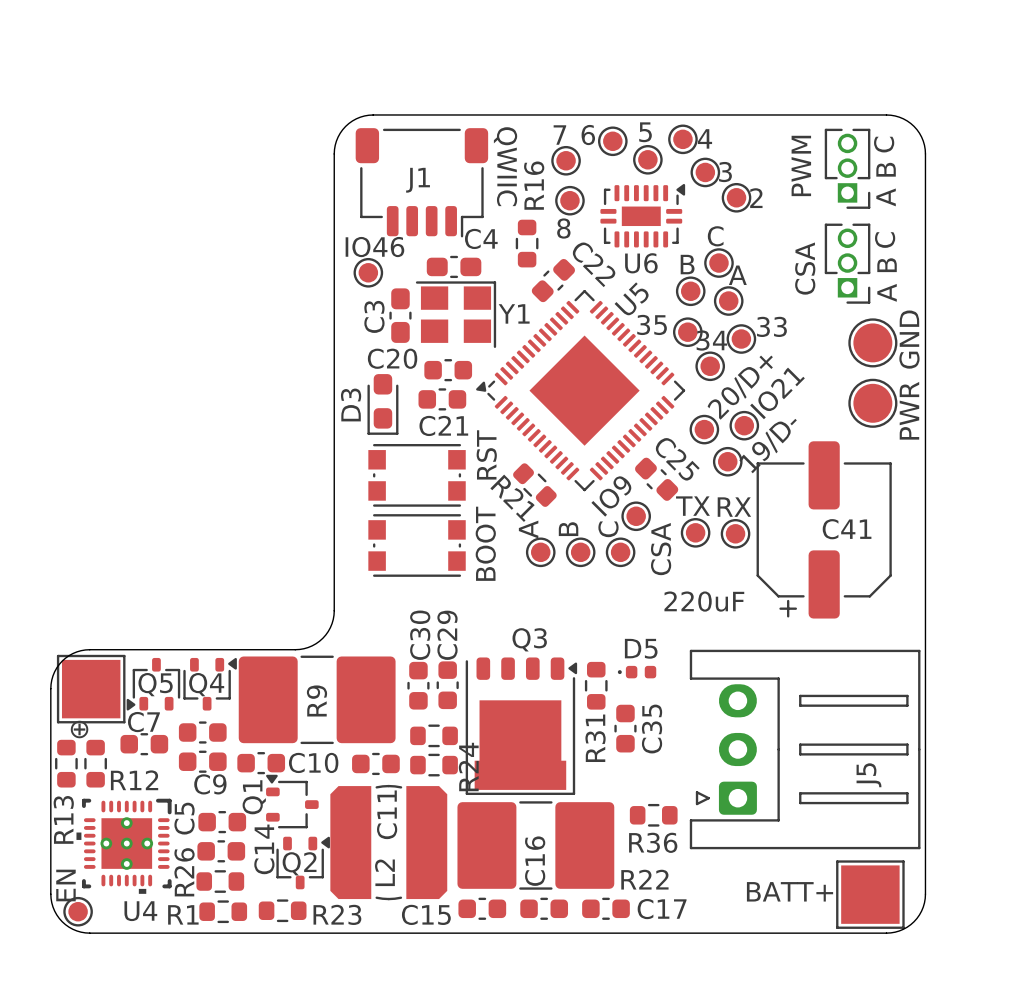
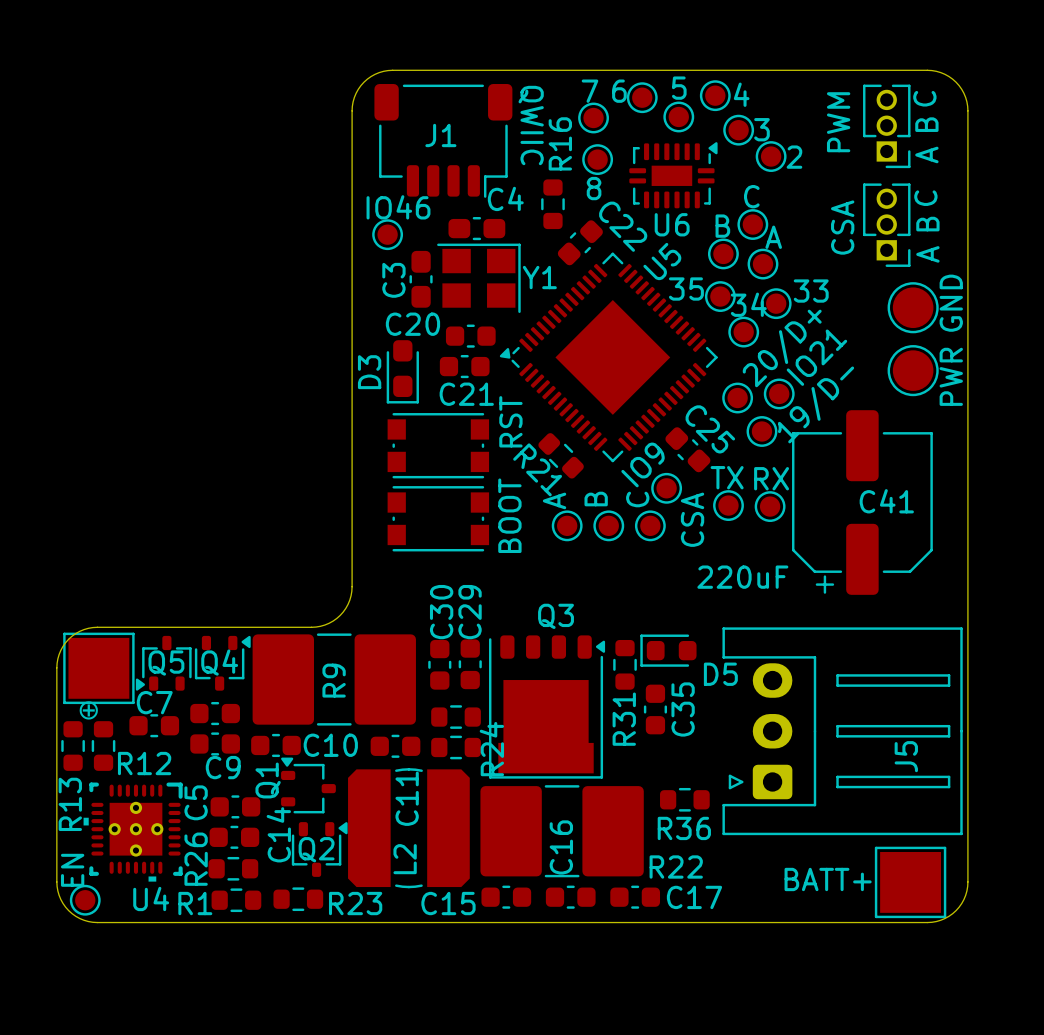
D5 name position: D5 (641, 648) -> D5 (720, 674)
D5 footprint: [617, 665, 657, 679] -> [640, 634, 697, 667]

